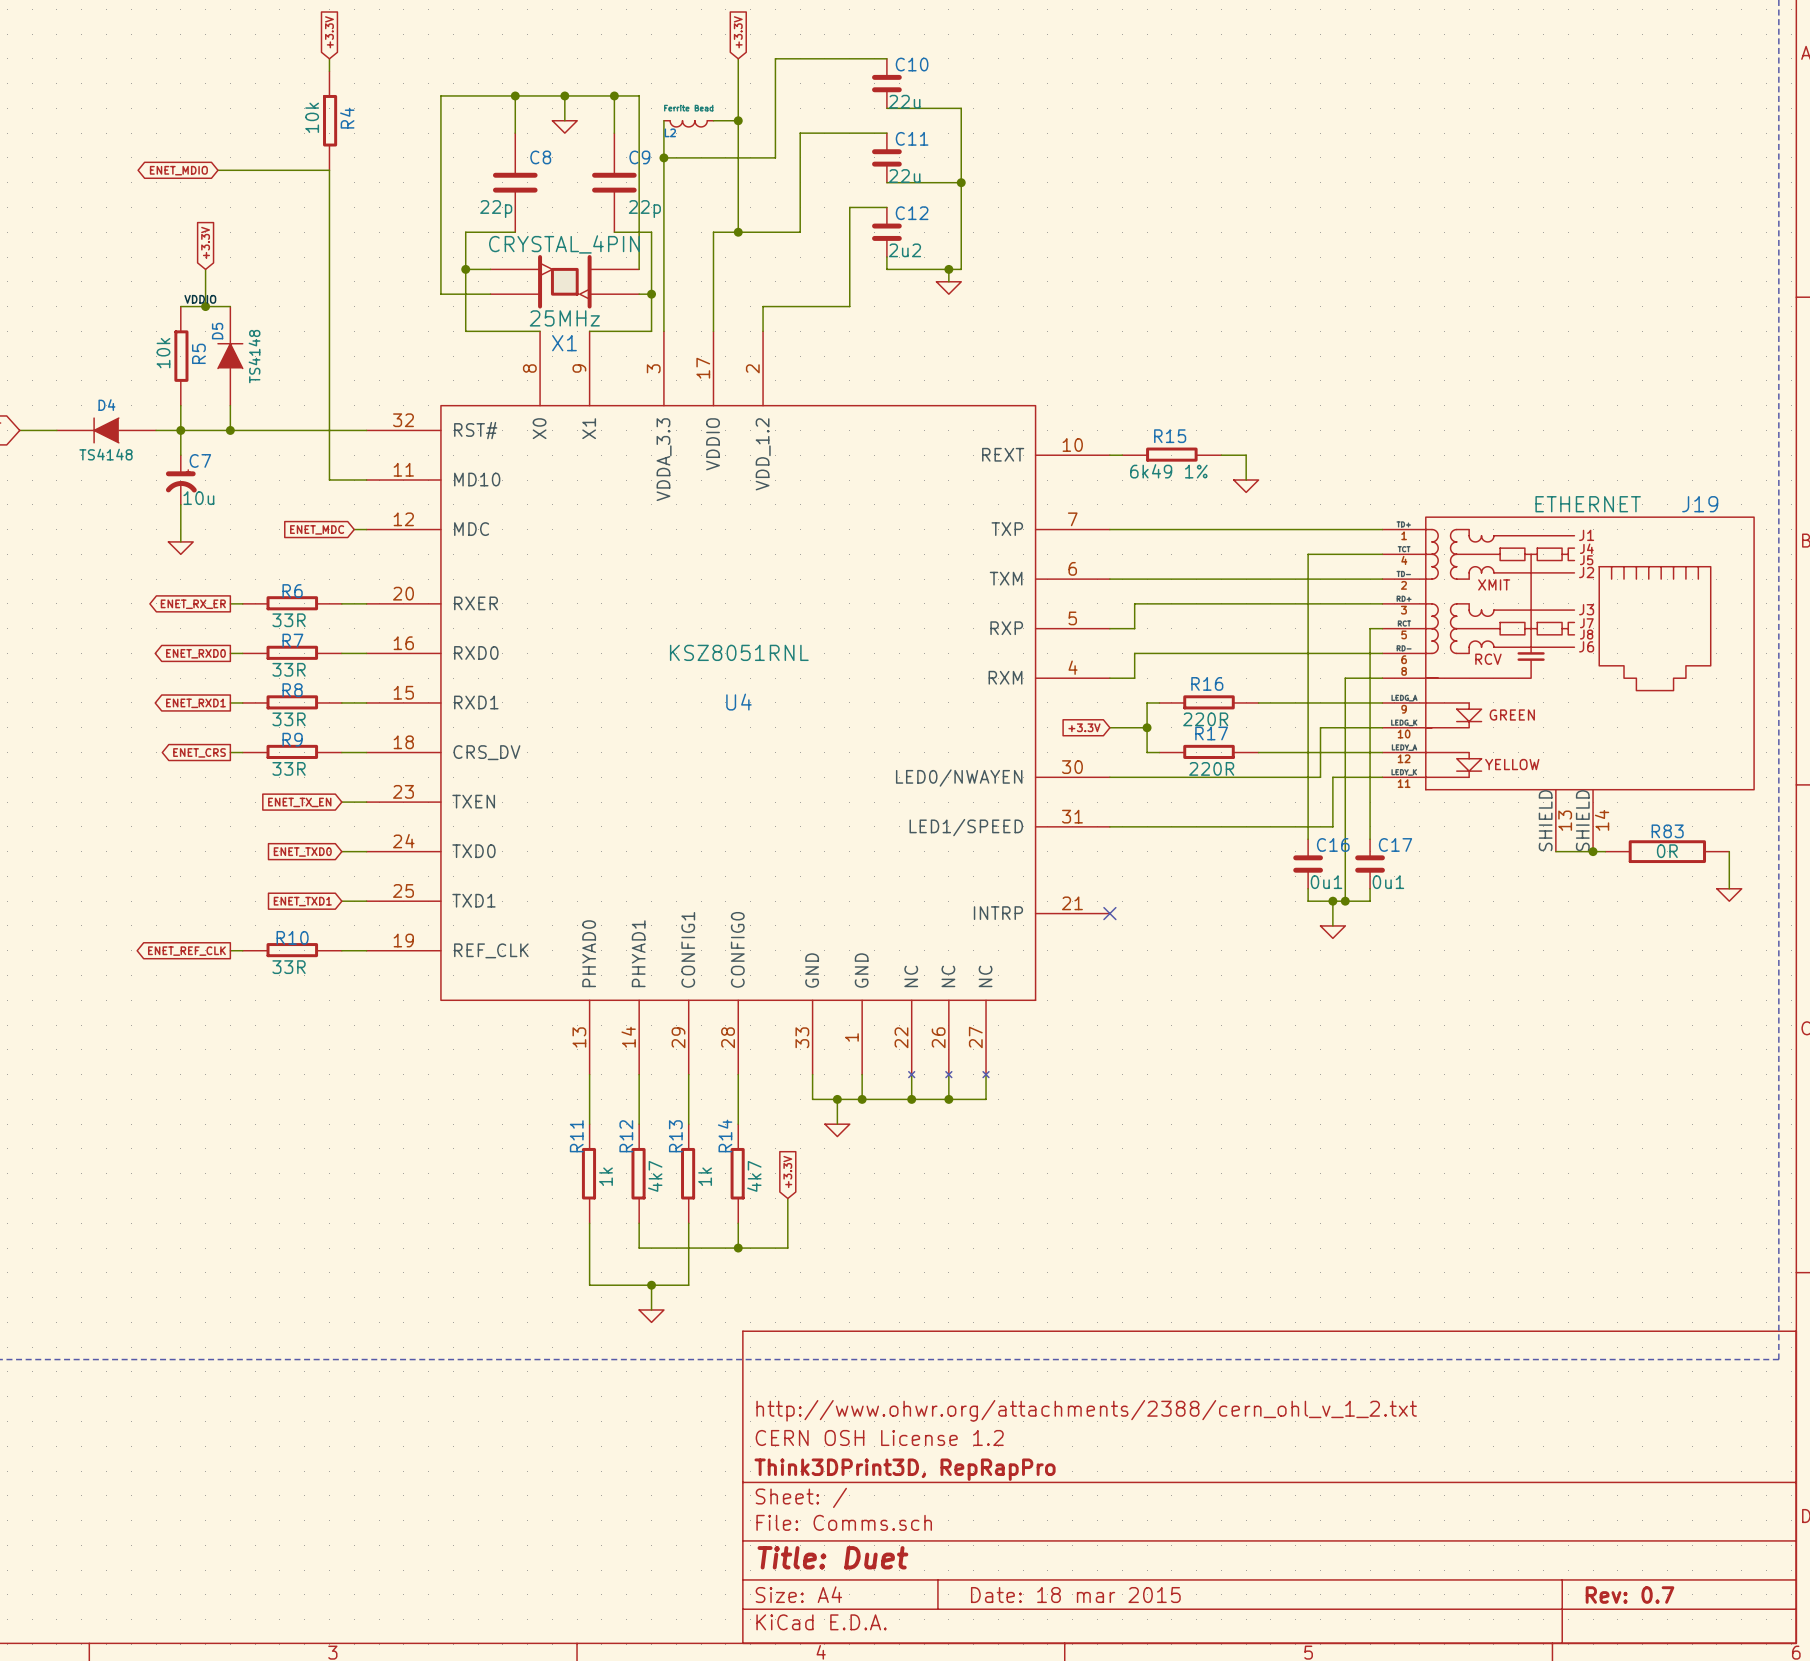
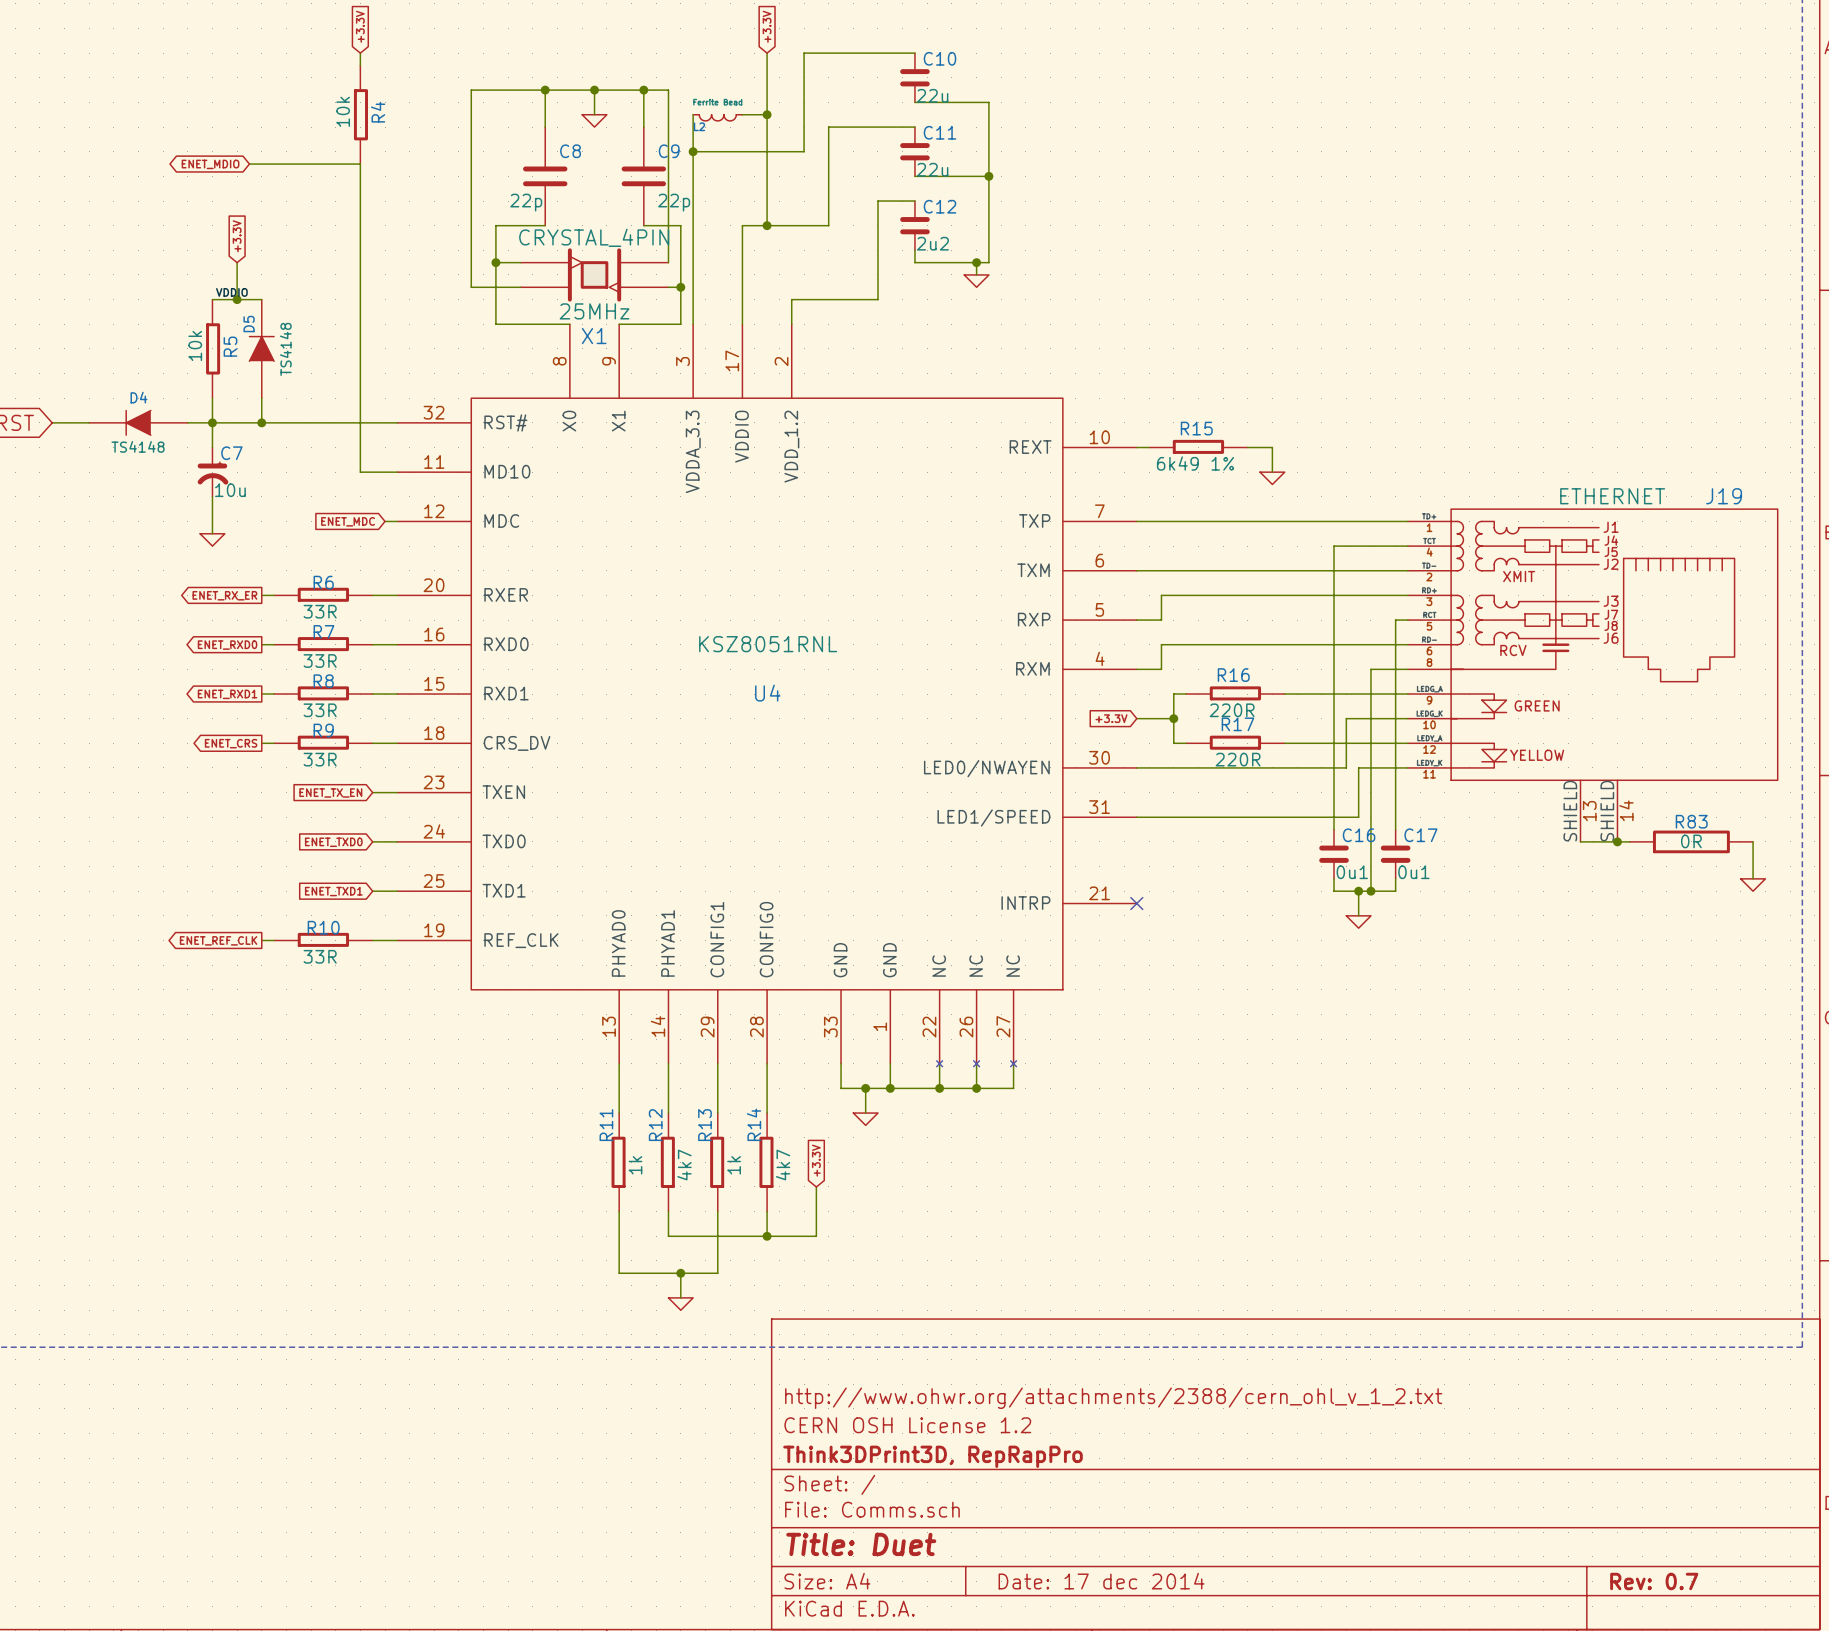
title block: Date: 18 mar 2015 (1075, 1595) -> Date: 17 dec 2014 (1101, 1581)

